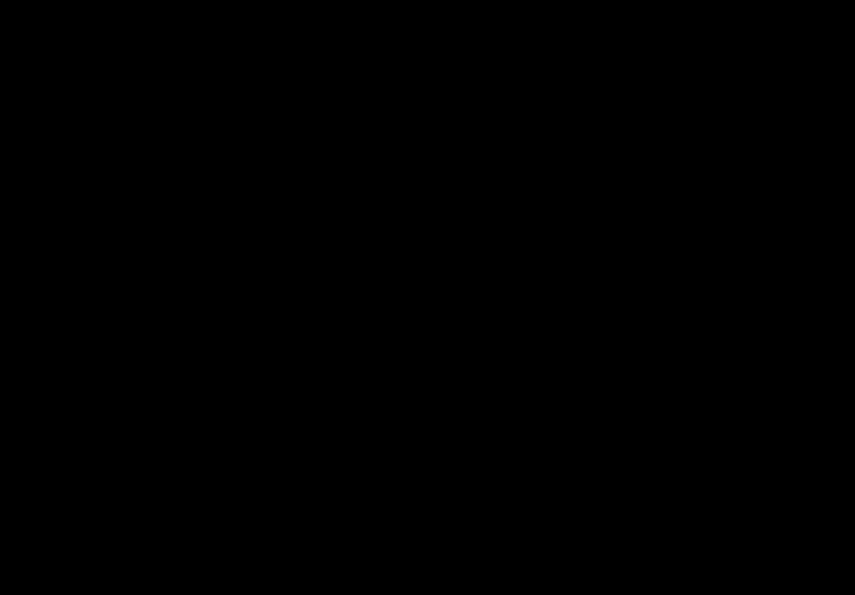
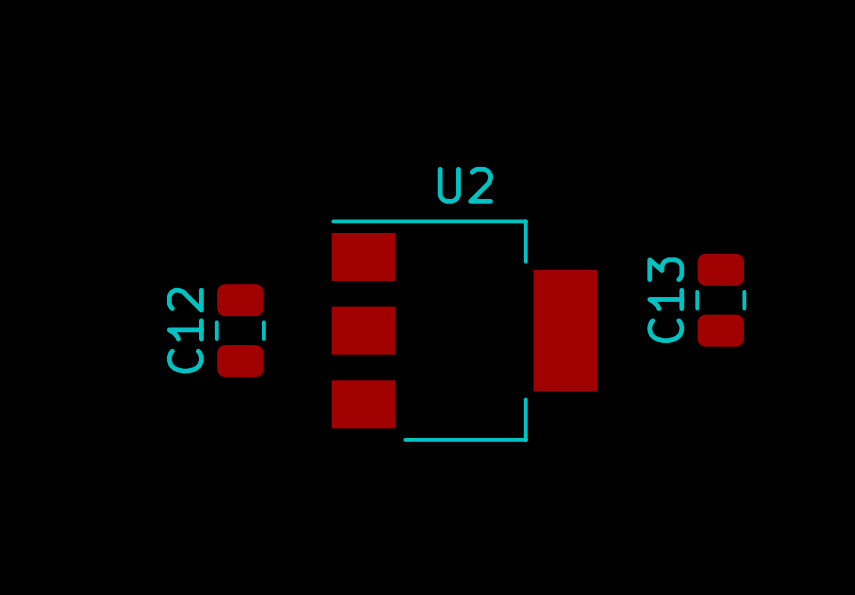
C13: none -> (720, 300)
C12: none -> (240, 330)
U2: none -> (464, 330)

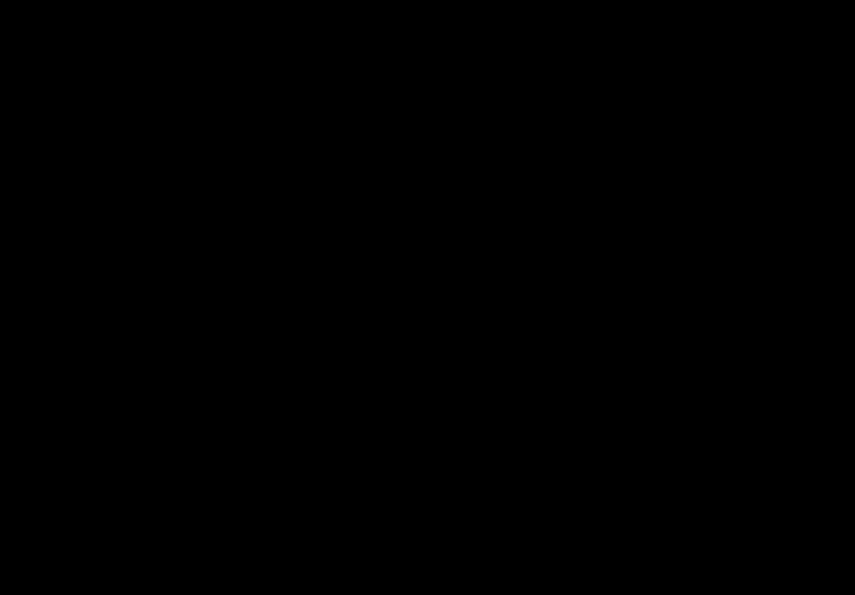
C13: (720, 300) -> none
C12: (240, 330) -> none
U2: (464, 330) -> none

